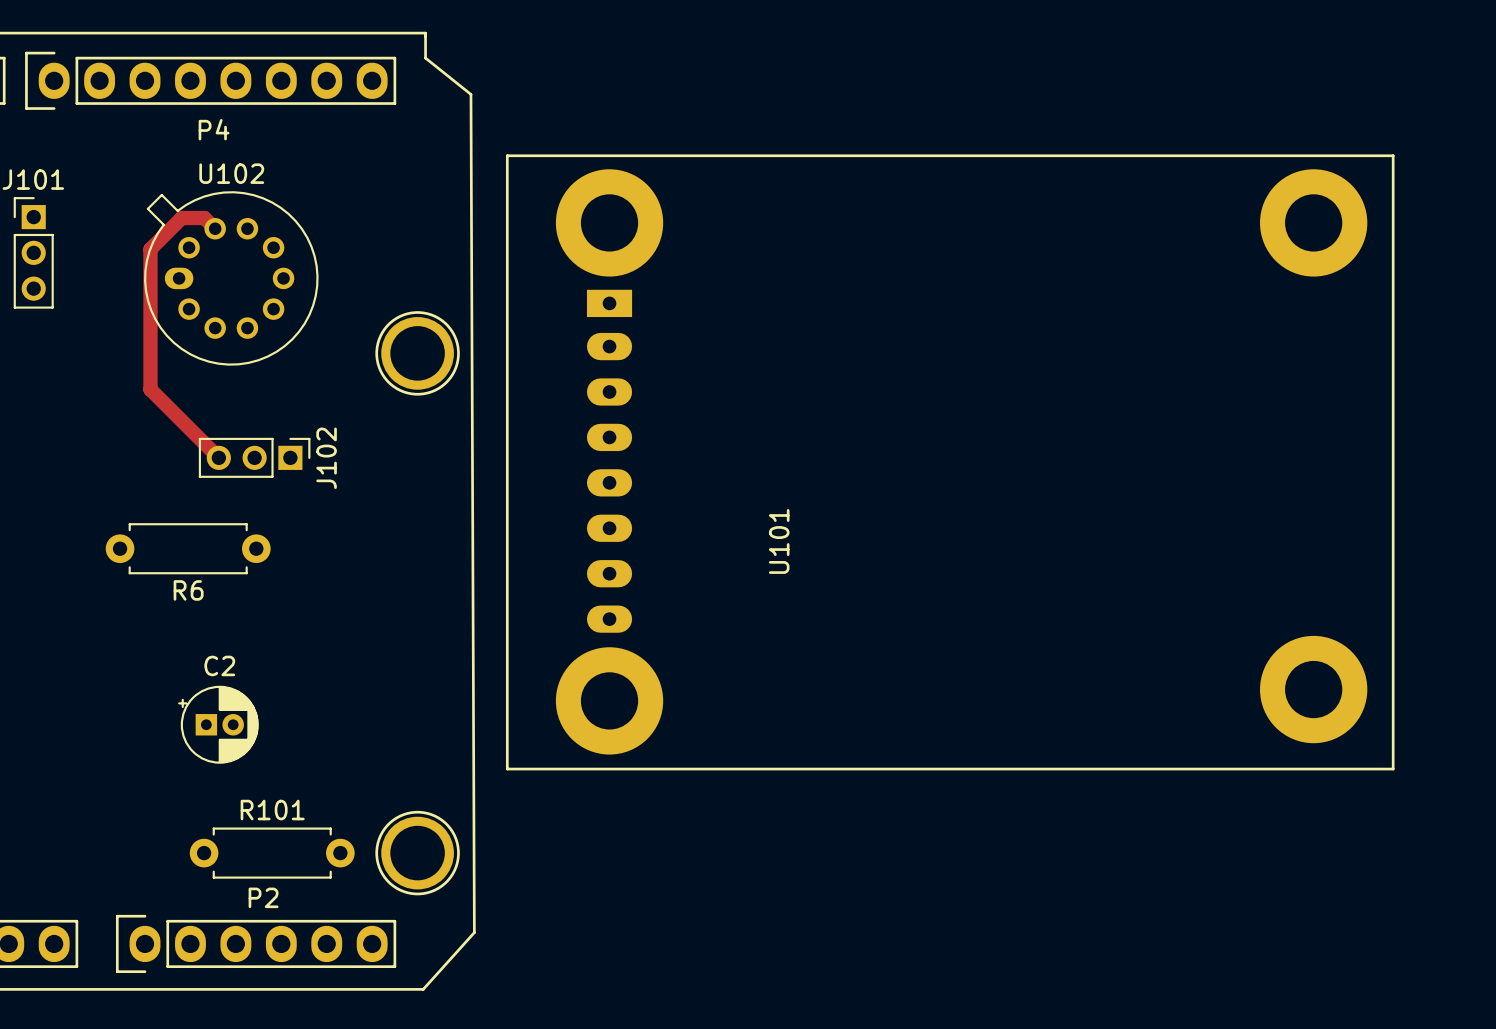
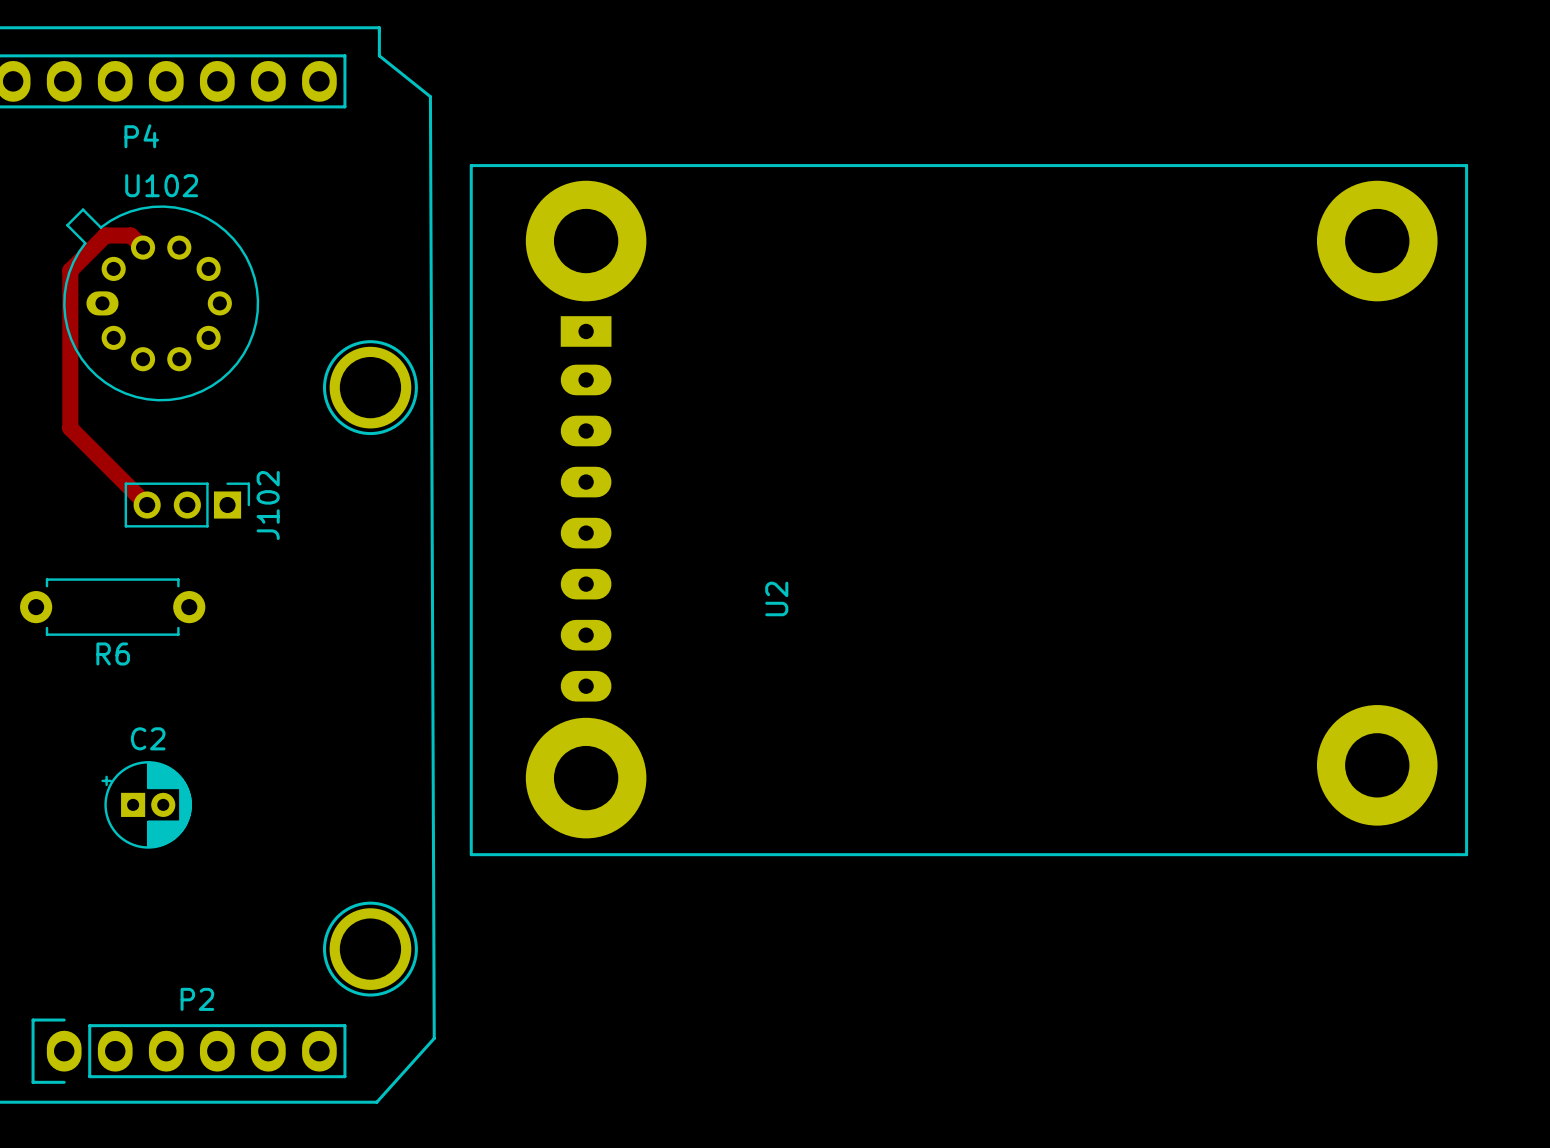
U101 name: U101 (779, 541) -> U2 (776, 598)
R101: (272, 853) -> none

